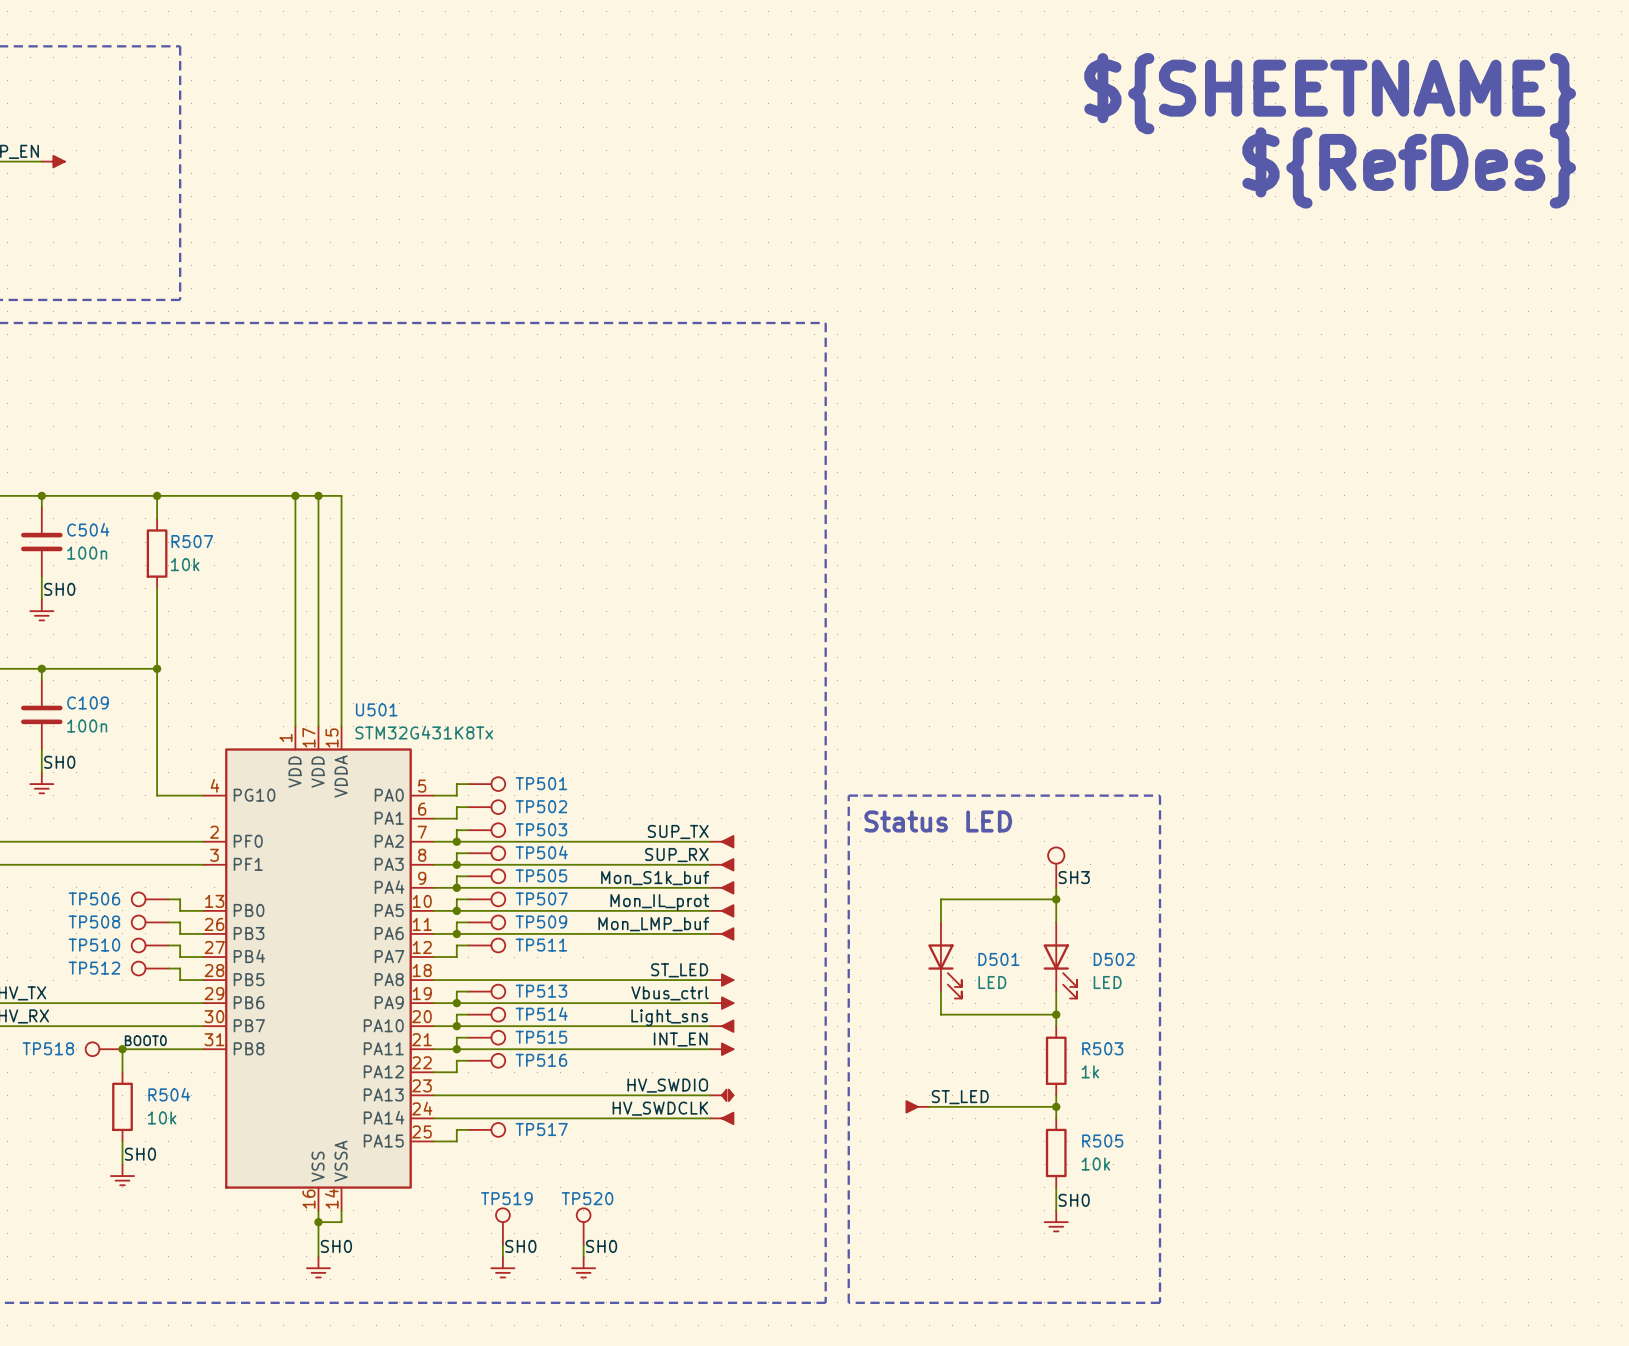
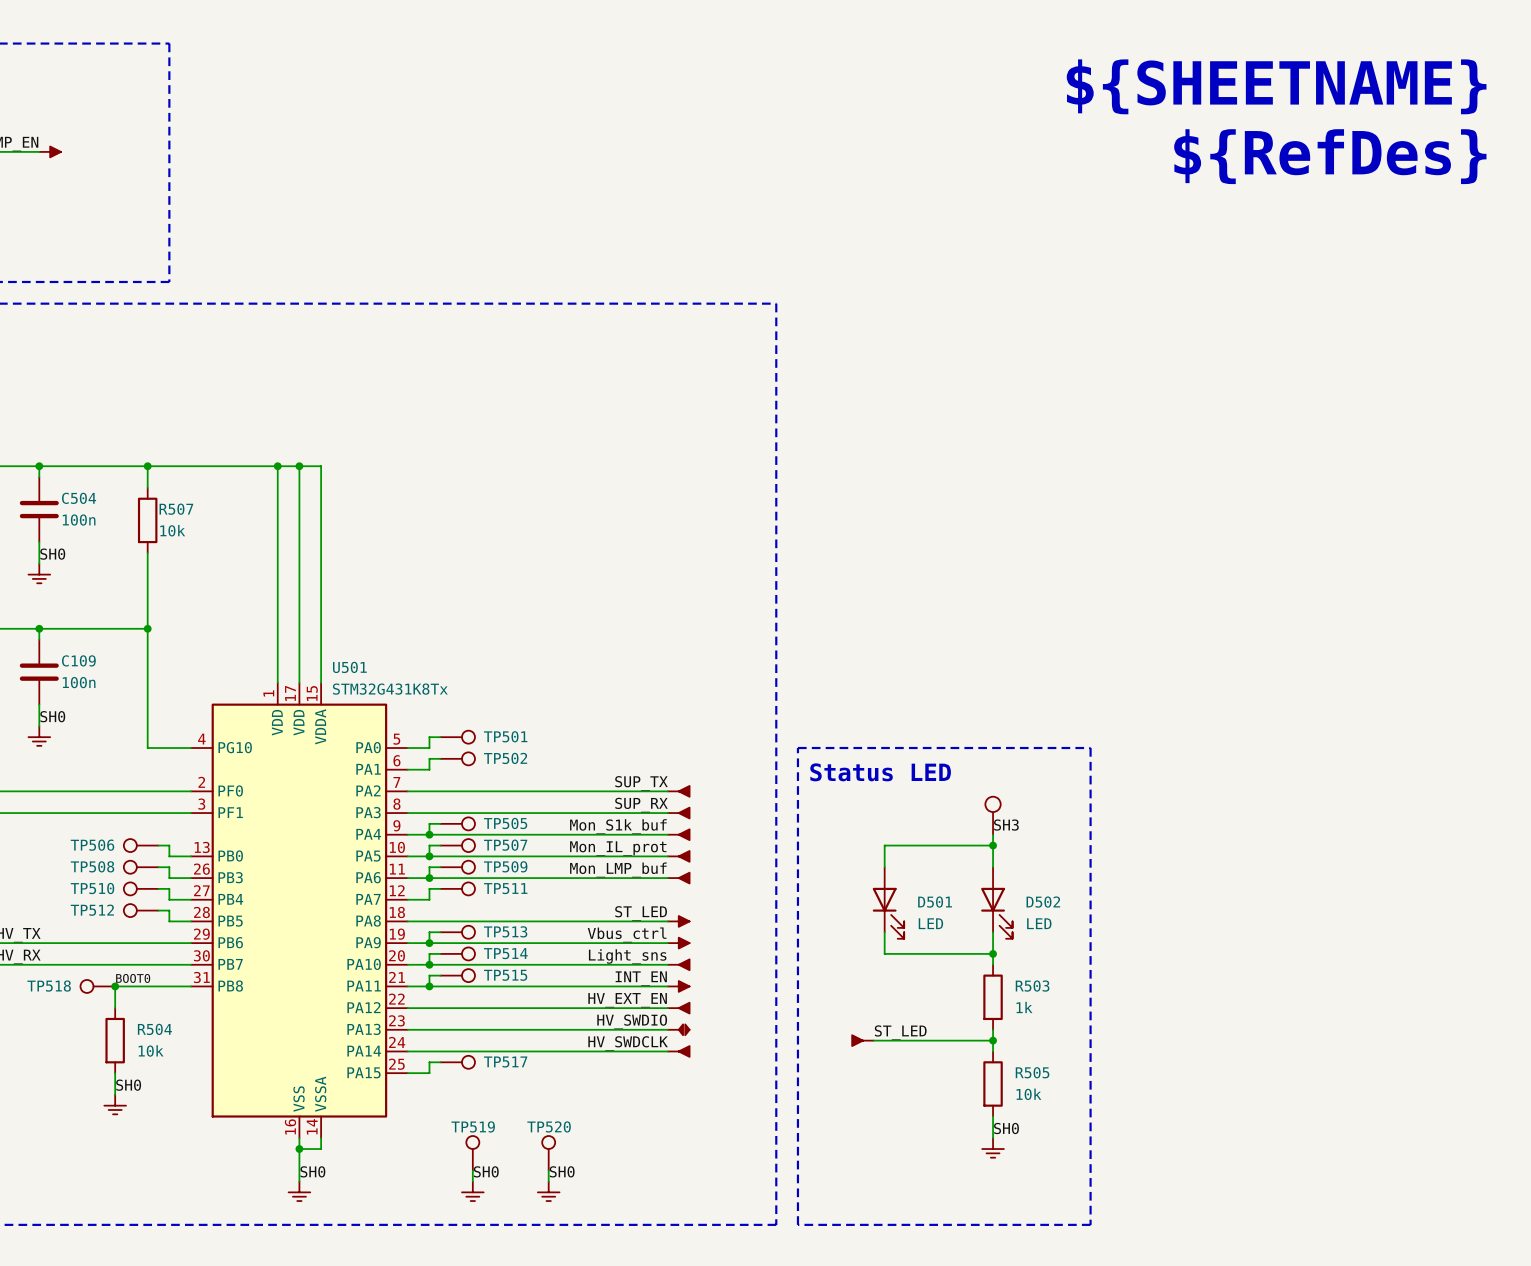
wire: (468, 830) (456, 830) (456, 841) -> none
TP503: (486, 830) -> none
junction: (456, 841) -> none
wire: (468, 853) (456, 853) (456, 864) -> none
TP504: (486, 853) -> none
junction: (456, 864) -> none
wire: (468, 1060) (456, 1060) (456, 1072) -> (667, 1008) (429, 1008)
TP516: (486, 1060) -> none
label: none -> HV_EXT_EN (627, 1000)
part: none -> (678, 1008)

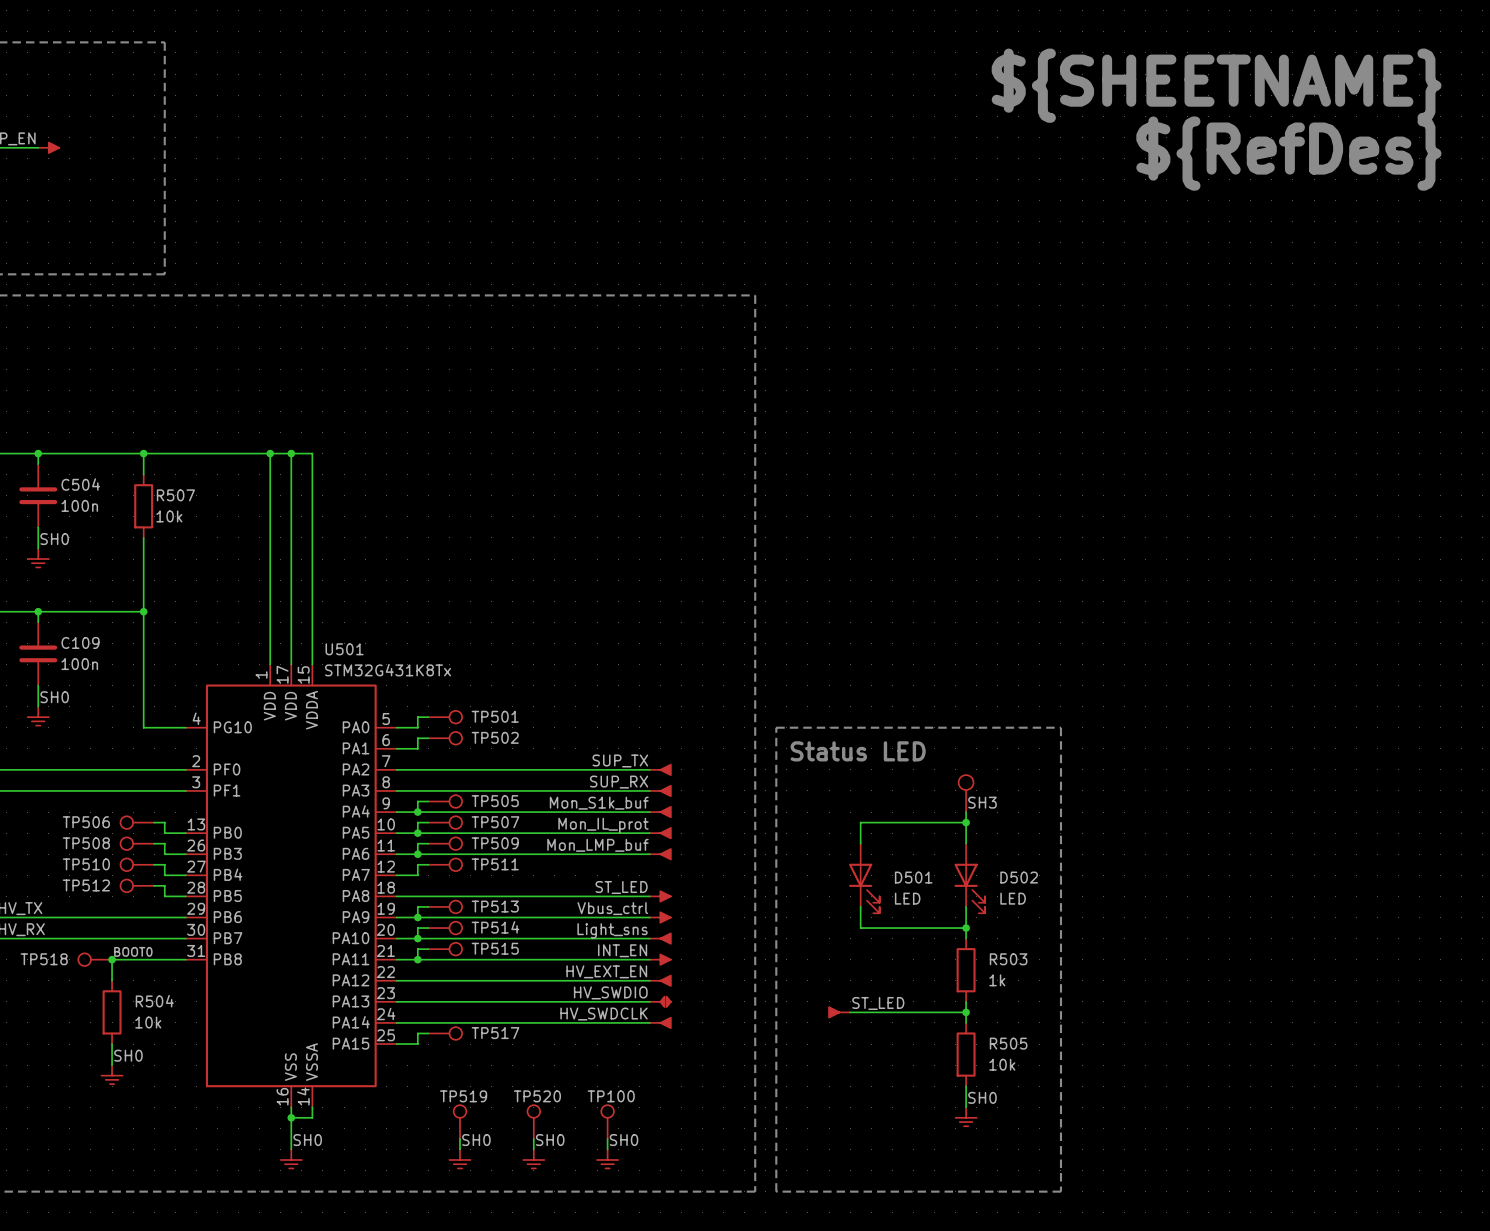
TP100: none -> (607, 1122)
wire: none -> (607, 1138) (607, 1149)
label: none -> SH0 (624, 1140)
part: none -> (607, 1159)

